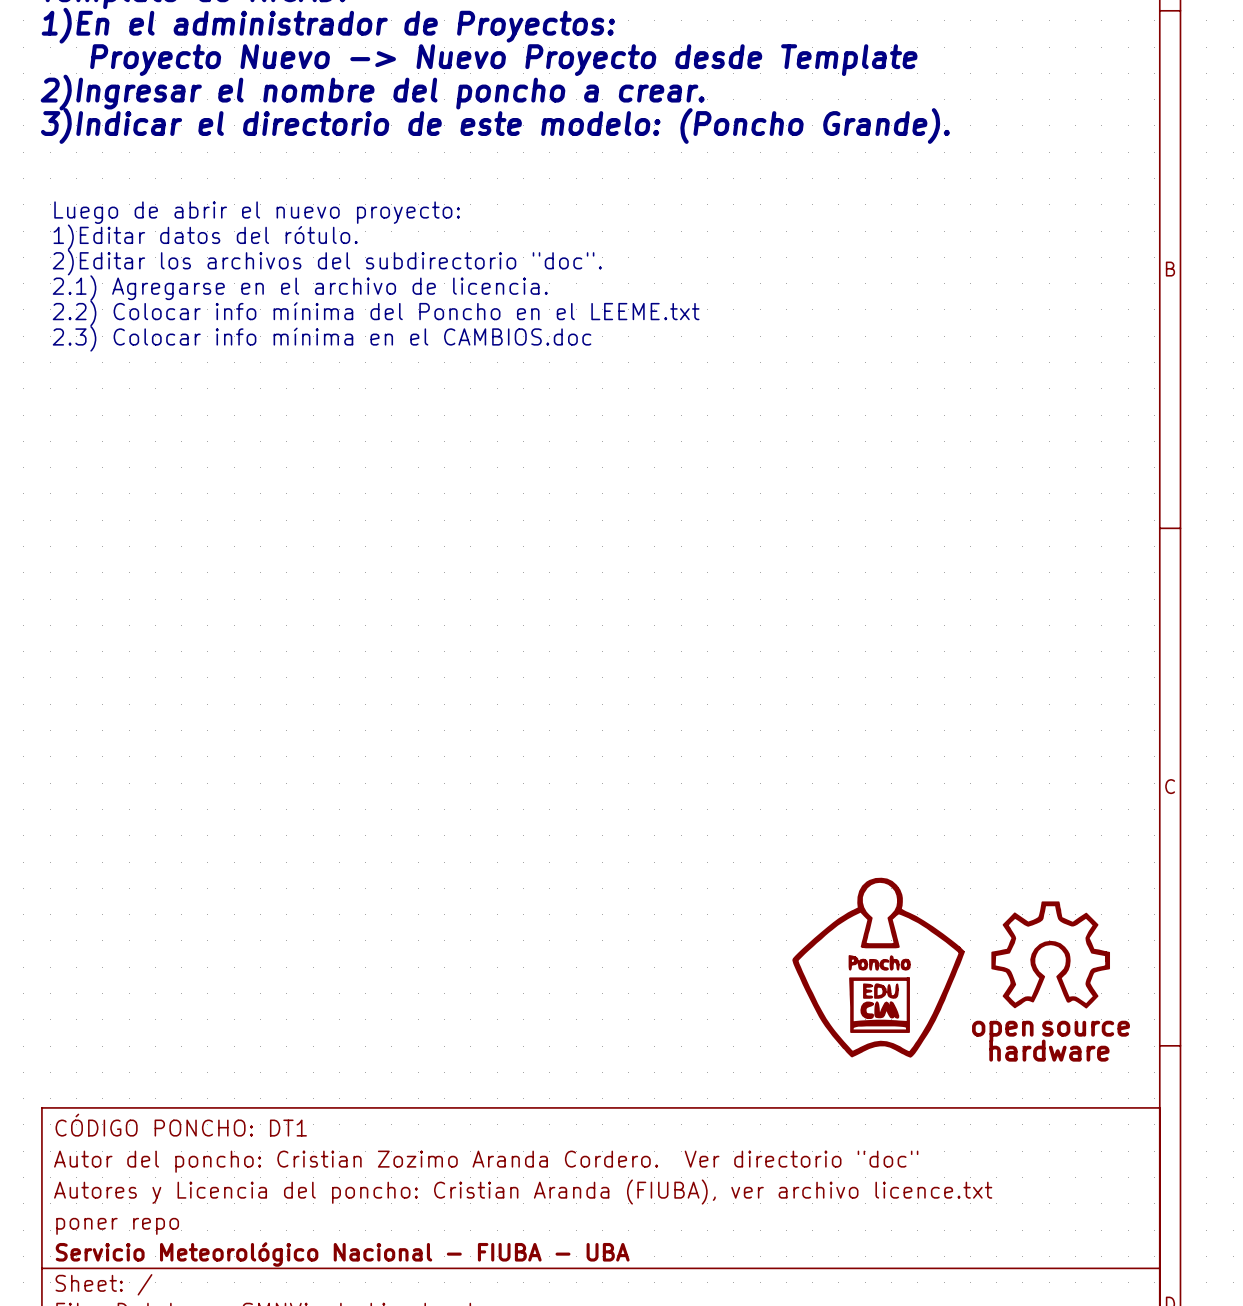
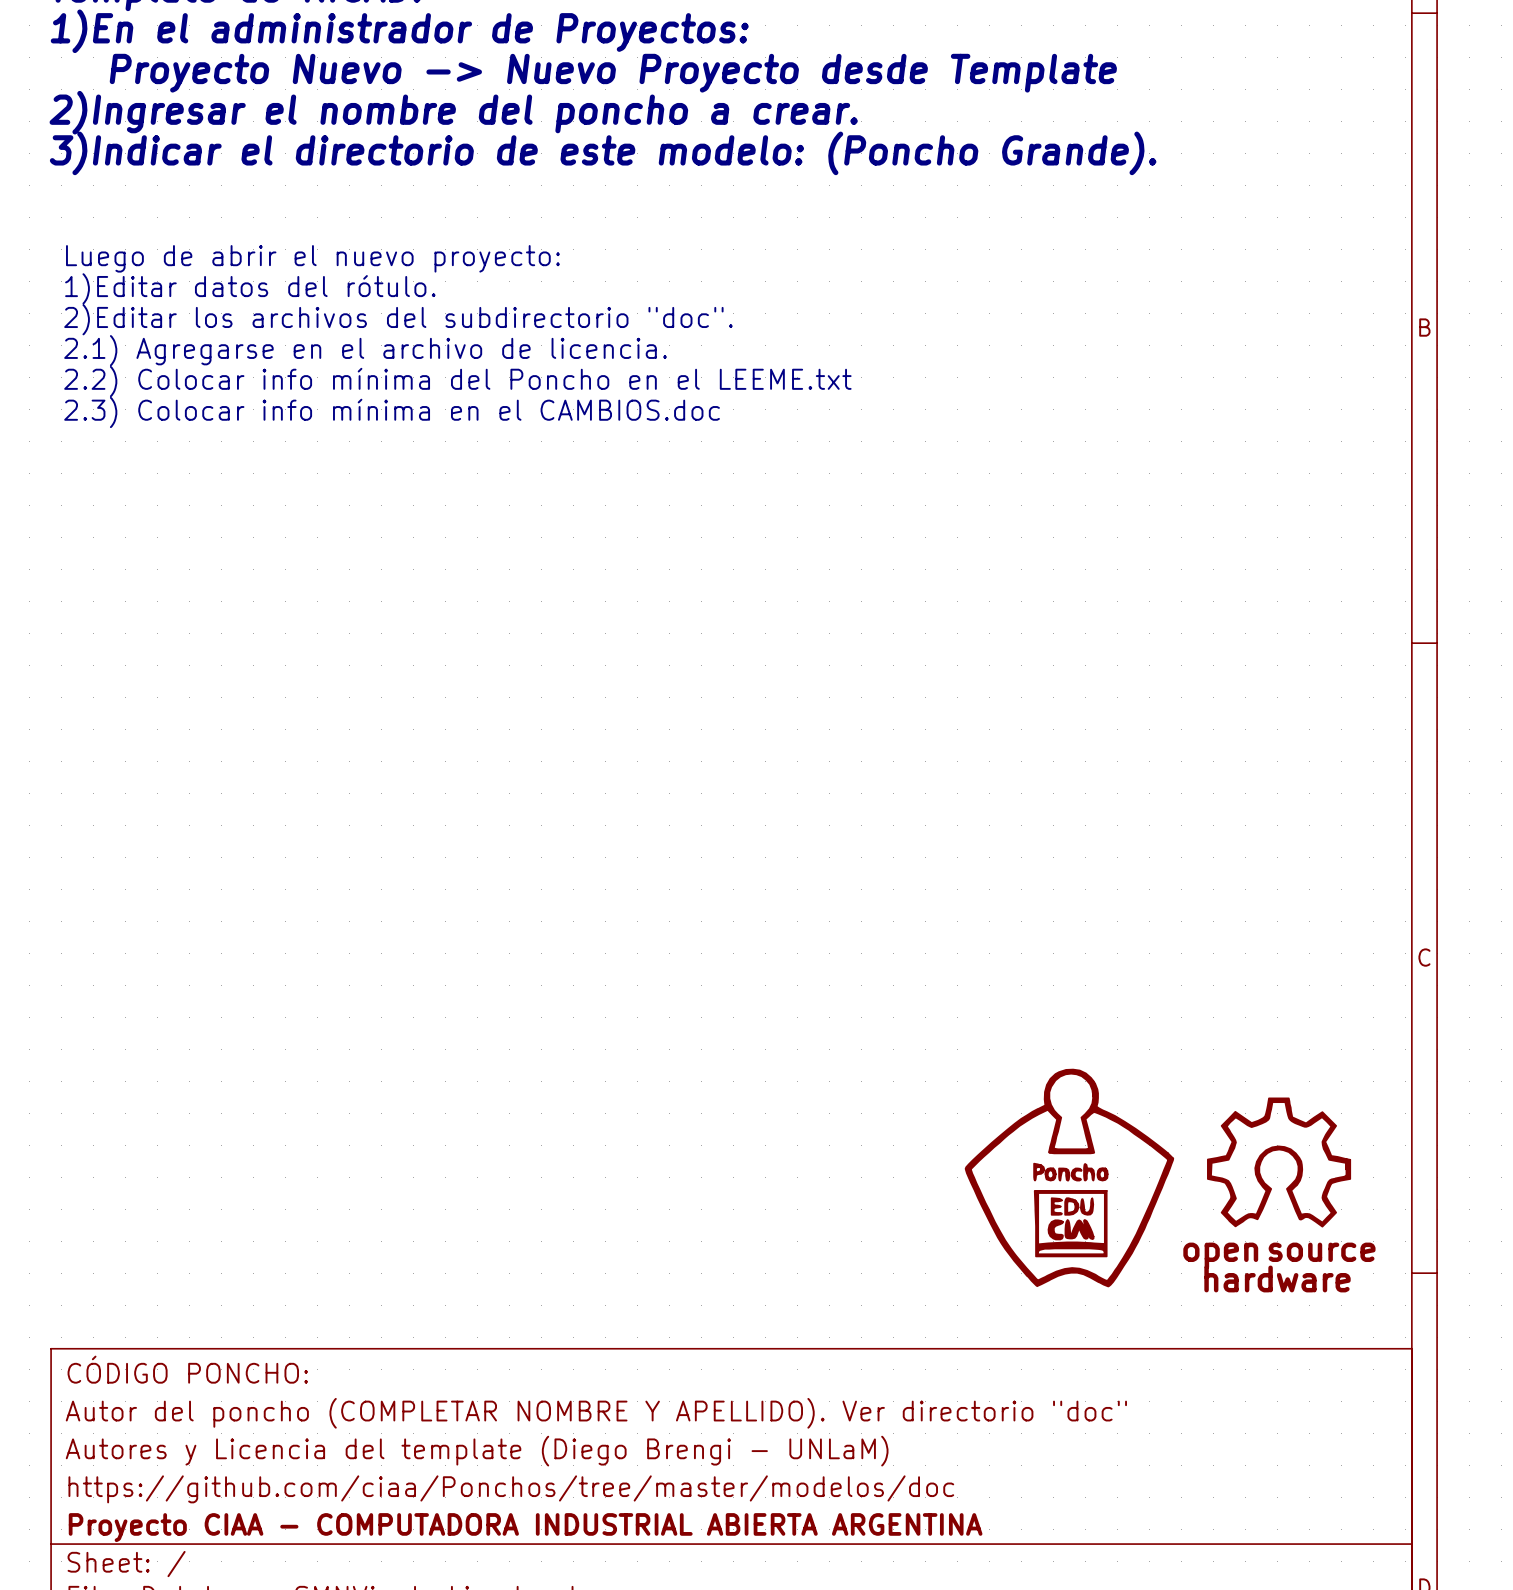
title block: CÓDIGO PONCHO: DT1 (181, 1125) -> CÓDIGO PONCHO: (187, 1369)
title block: Autor del poncho: Cristian Zozimo Aranda Cordero. Ver directorio "doc" (486, 1161) -> Autor del poncho (COMPLETAR NOMBRE Y APELLIDO). Ver directorio "doc" (596, 1413)
title block: Autores y Licencia del poncho: Cristian Aranda (FIUBA), ver archivo licence.txt (523, 1192) -> Autores y Licencia del template (Diego Brengi - UNLaM) (477, 1451)
title block: poner repo (117, 1226) -> https://github.com/ciaa/Ponchos/tree/master/modelos/doc (511, 1489)
title block: Servicio Meteorológico Nacional - FIUBA - UBA (342, 1254) -> Proyecto CIAA - COMPUTADORA INDUSTRIAL ABIERTA ARGENTINA (525, 1527)

